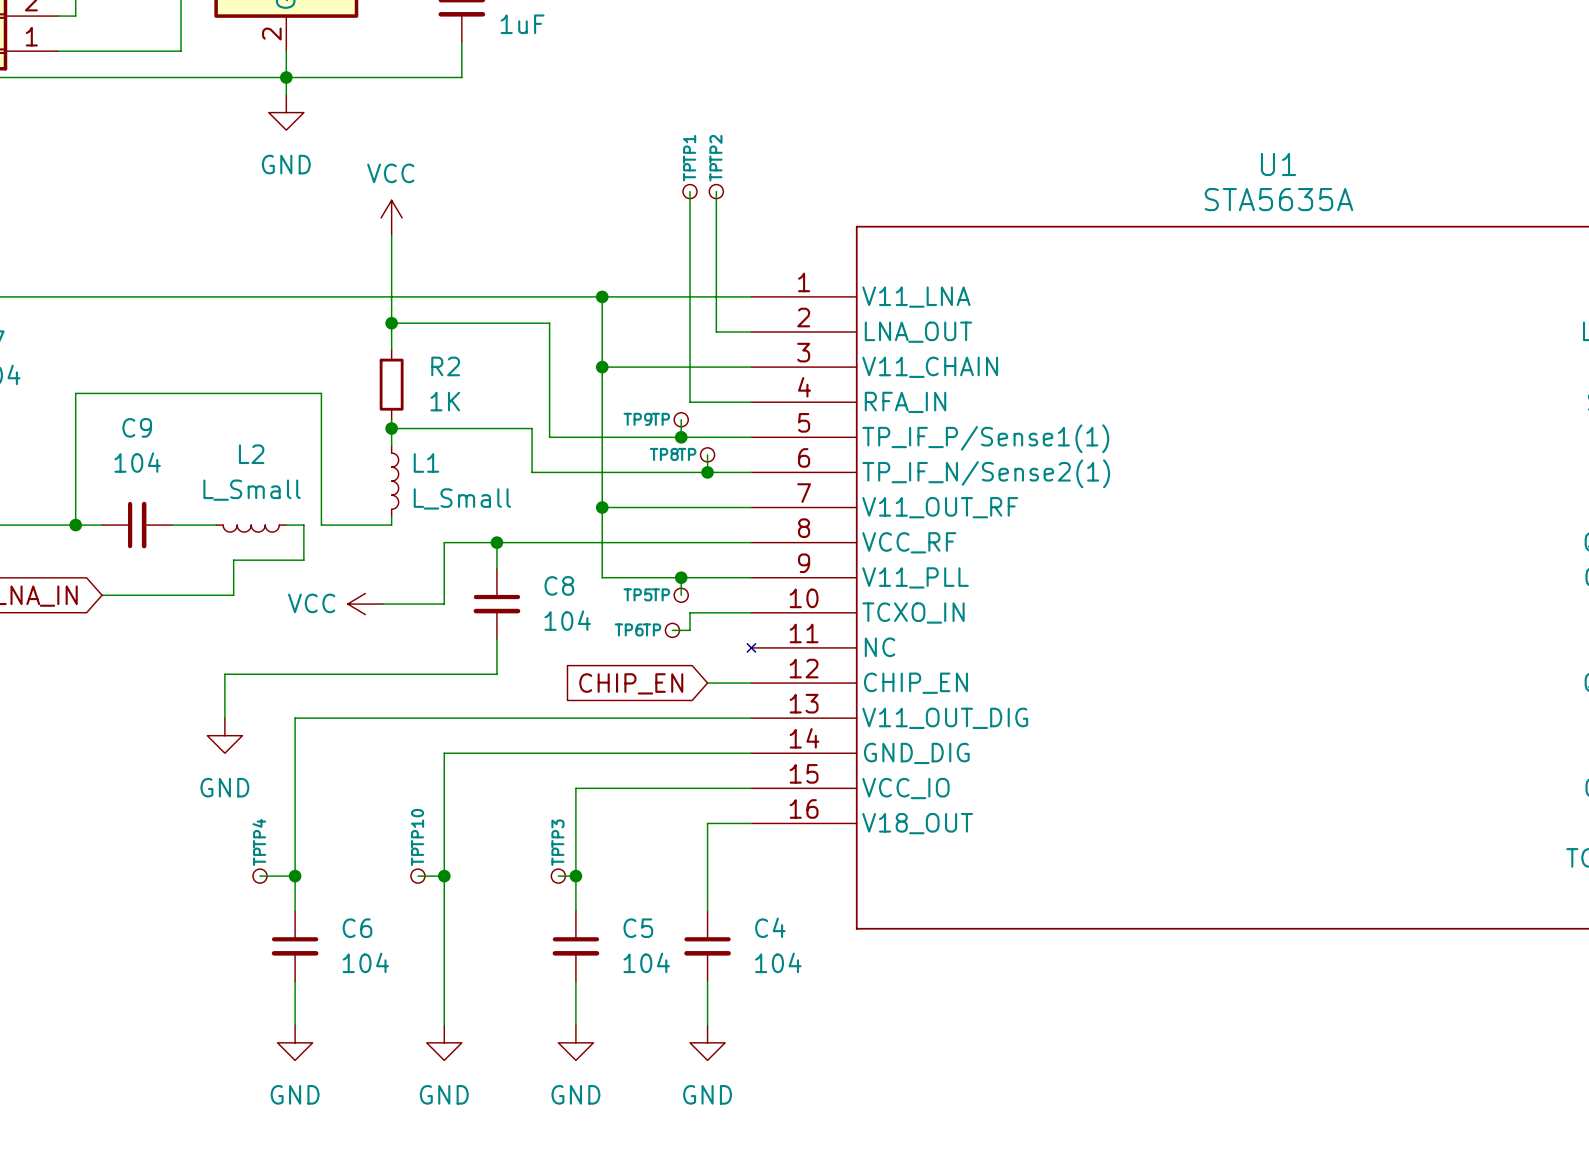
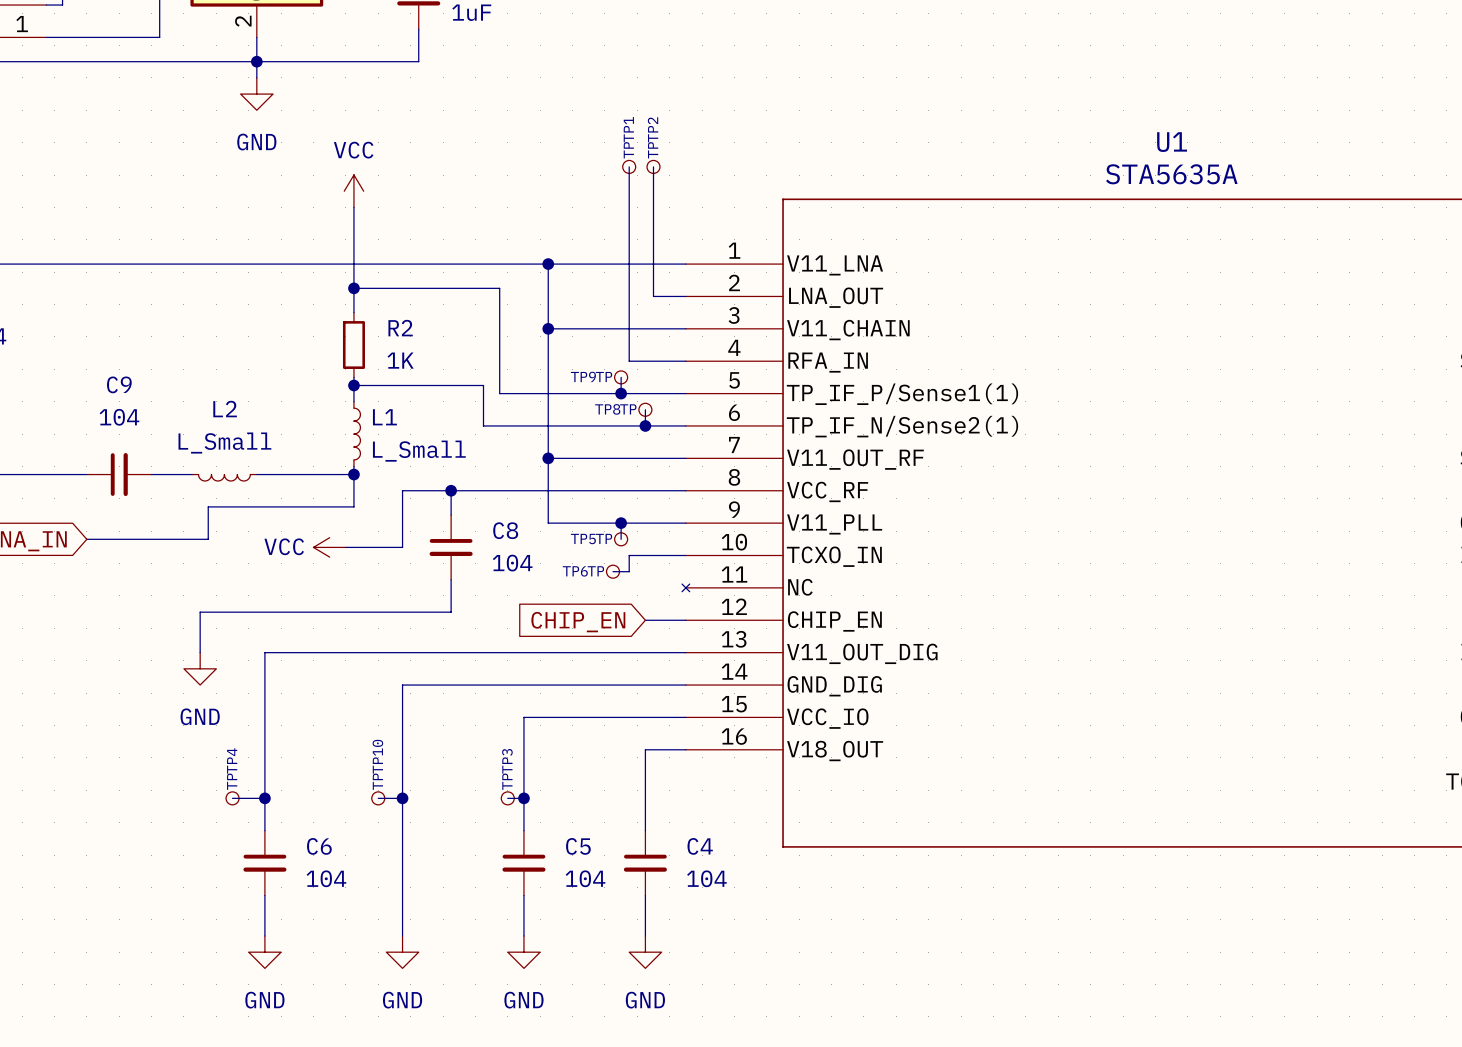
wire: (75, 525) (75, 393) (321, 393) (321, 525) -> none
junction: (75, 525) -> none
wire: (303, 525) (303, 560) -> (273, 474) (289, 474)
wire: none -> (353, 474) (353, 506) (273, 506)
junction: none -> (353, 474)

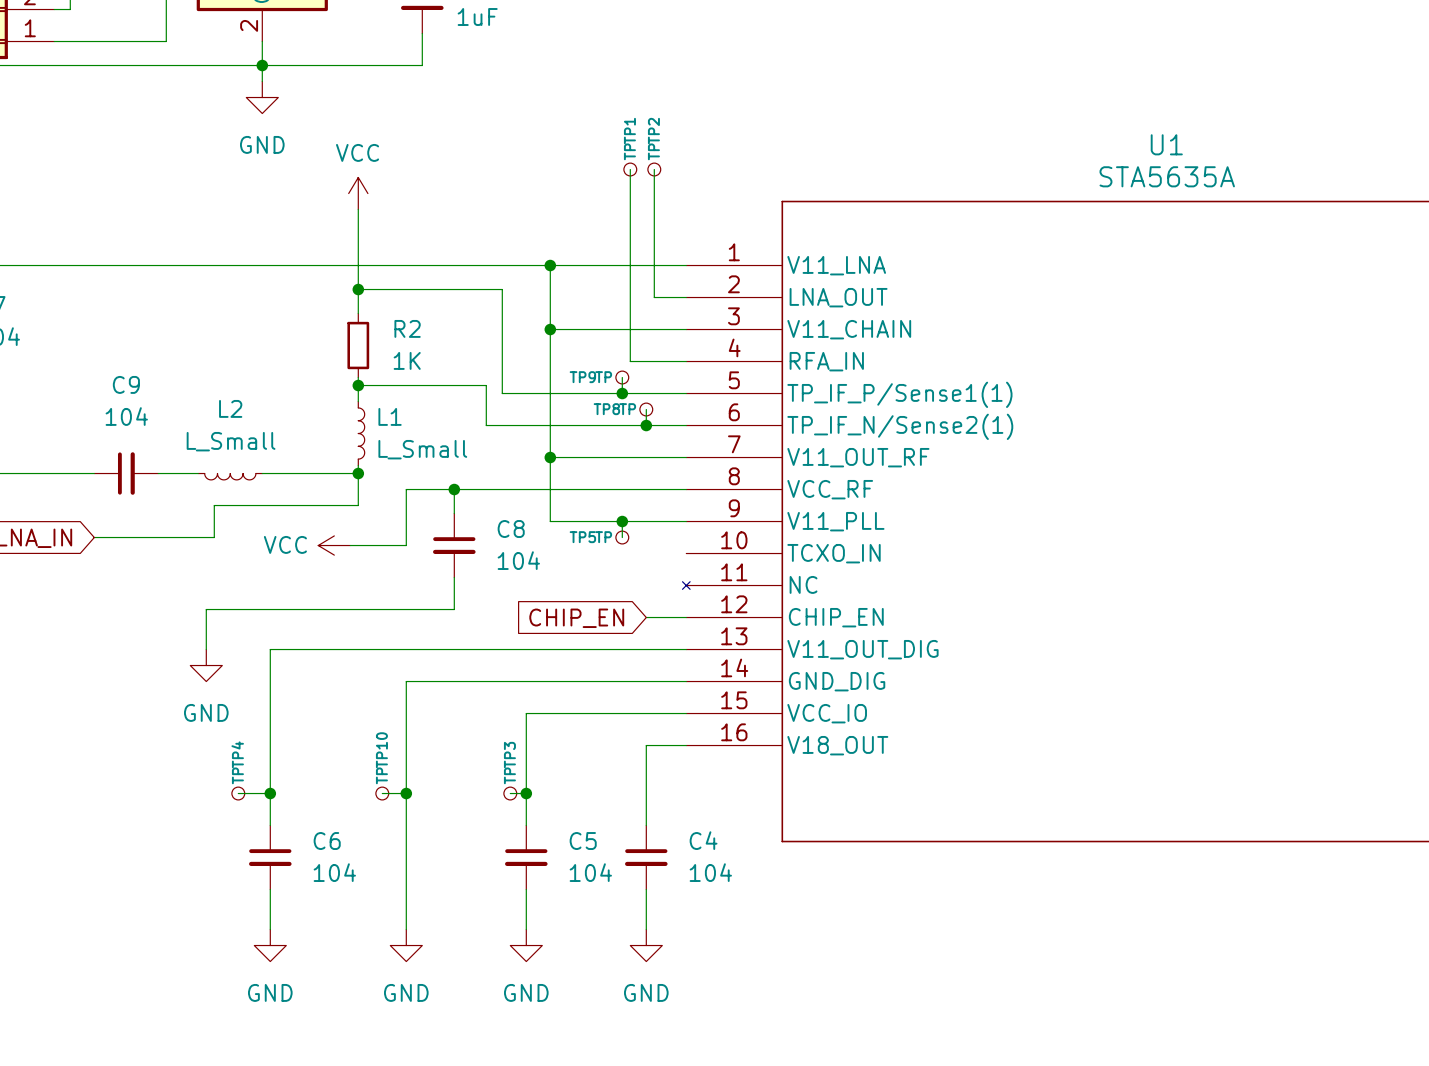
wire: (685, 555) (629, 555) (629, 571) (613, 571) -> none
TP6: TP (613, 571) -> none

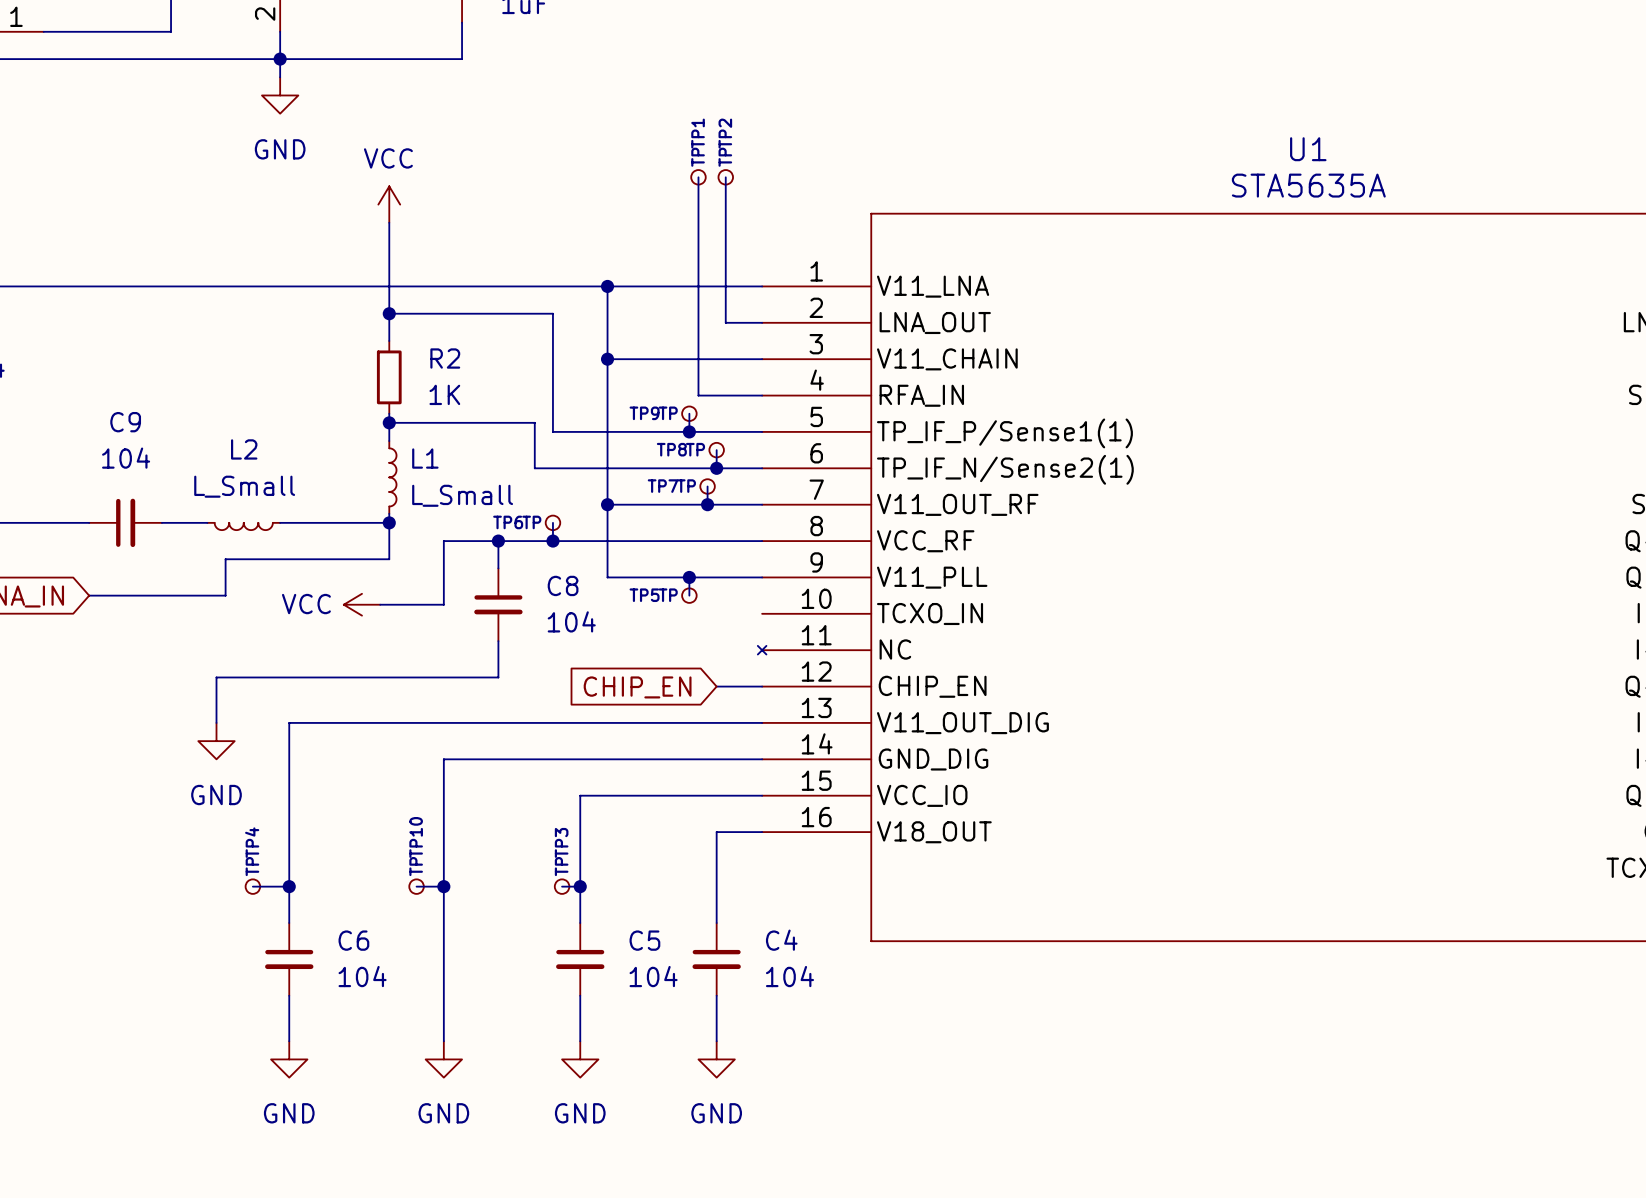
wire: none -> (707, 486) (707, 504)
TP7: none -> TP (707, 486)
junction: none -> (707, 504)
wire: none -> (552, 522) (552, 541)
TP6: none -> TP (552, 522)
junction: none -> (552, 541)

